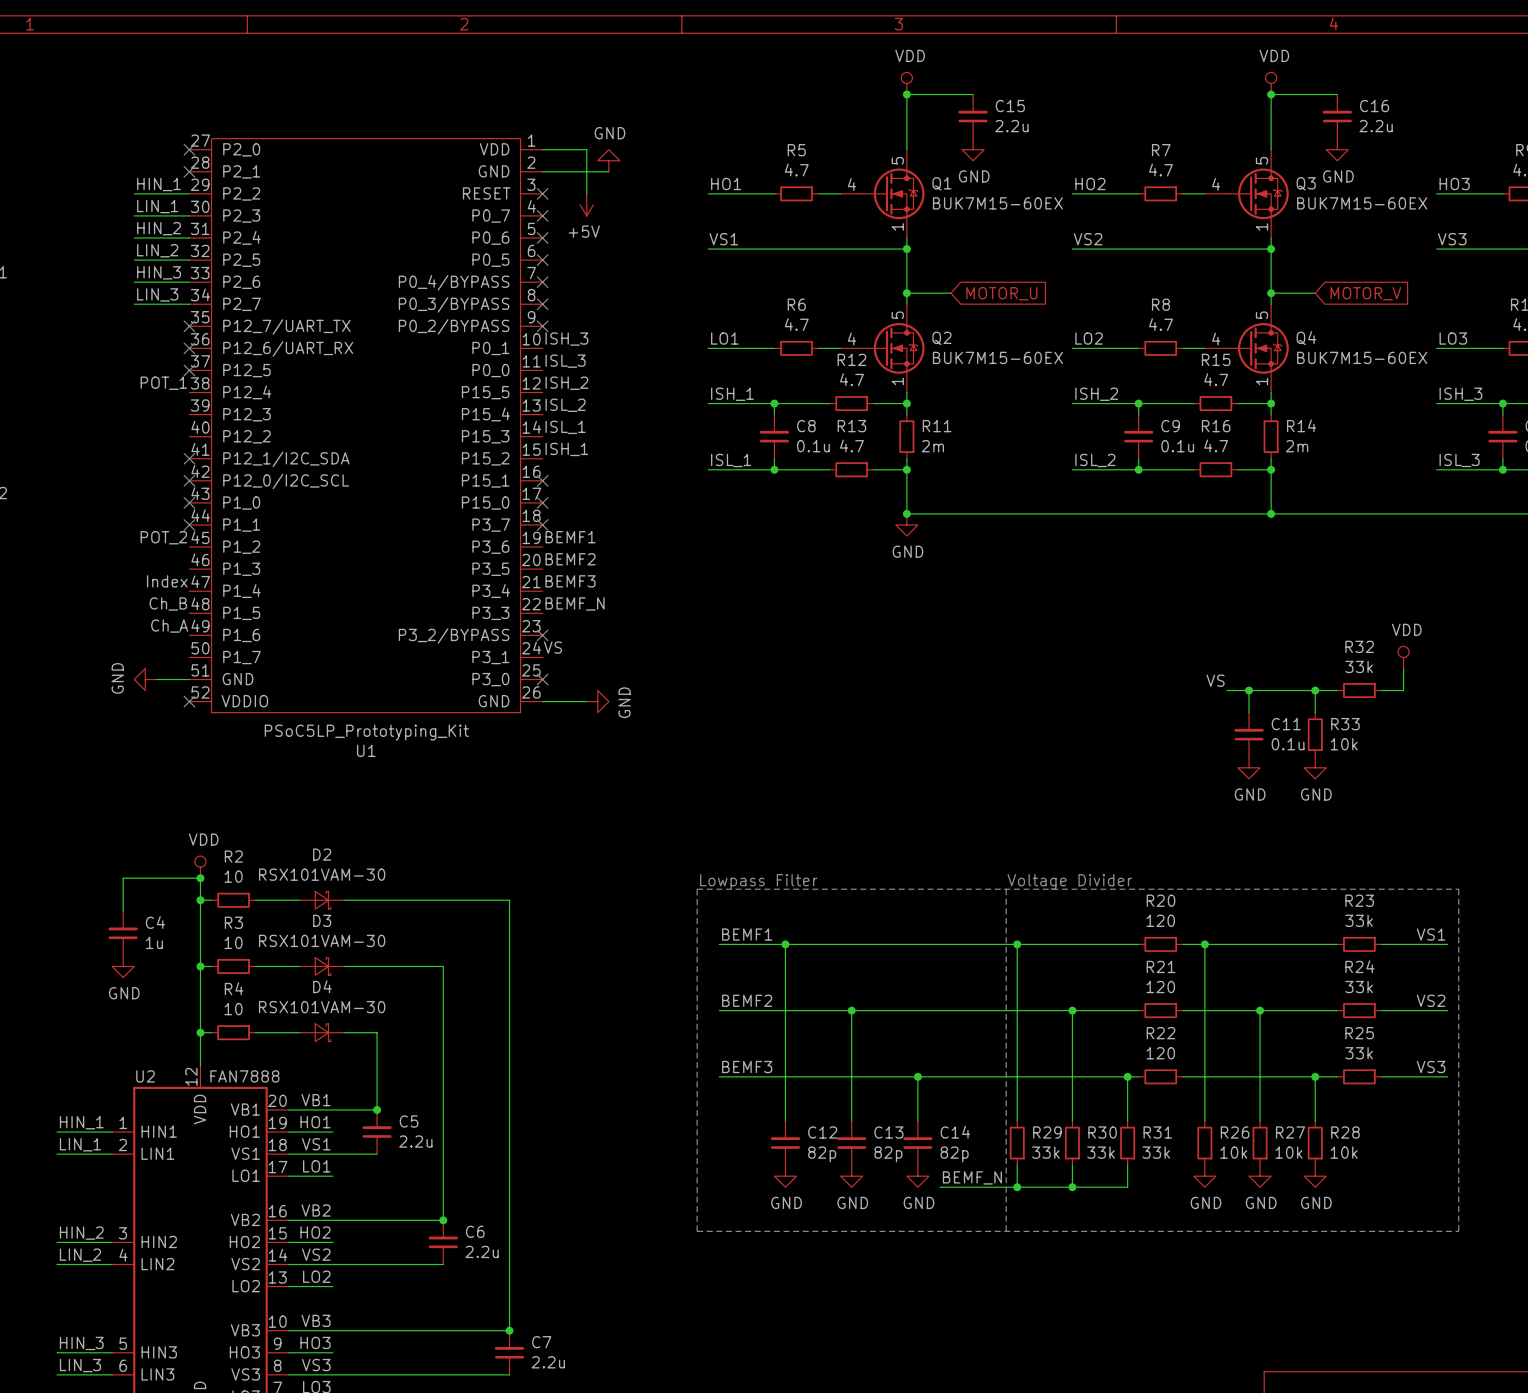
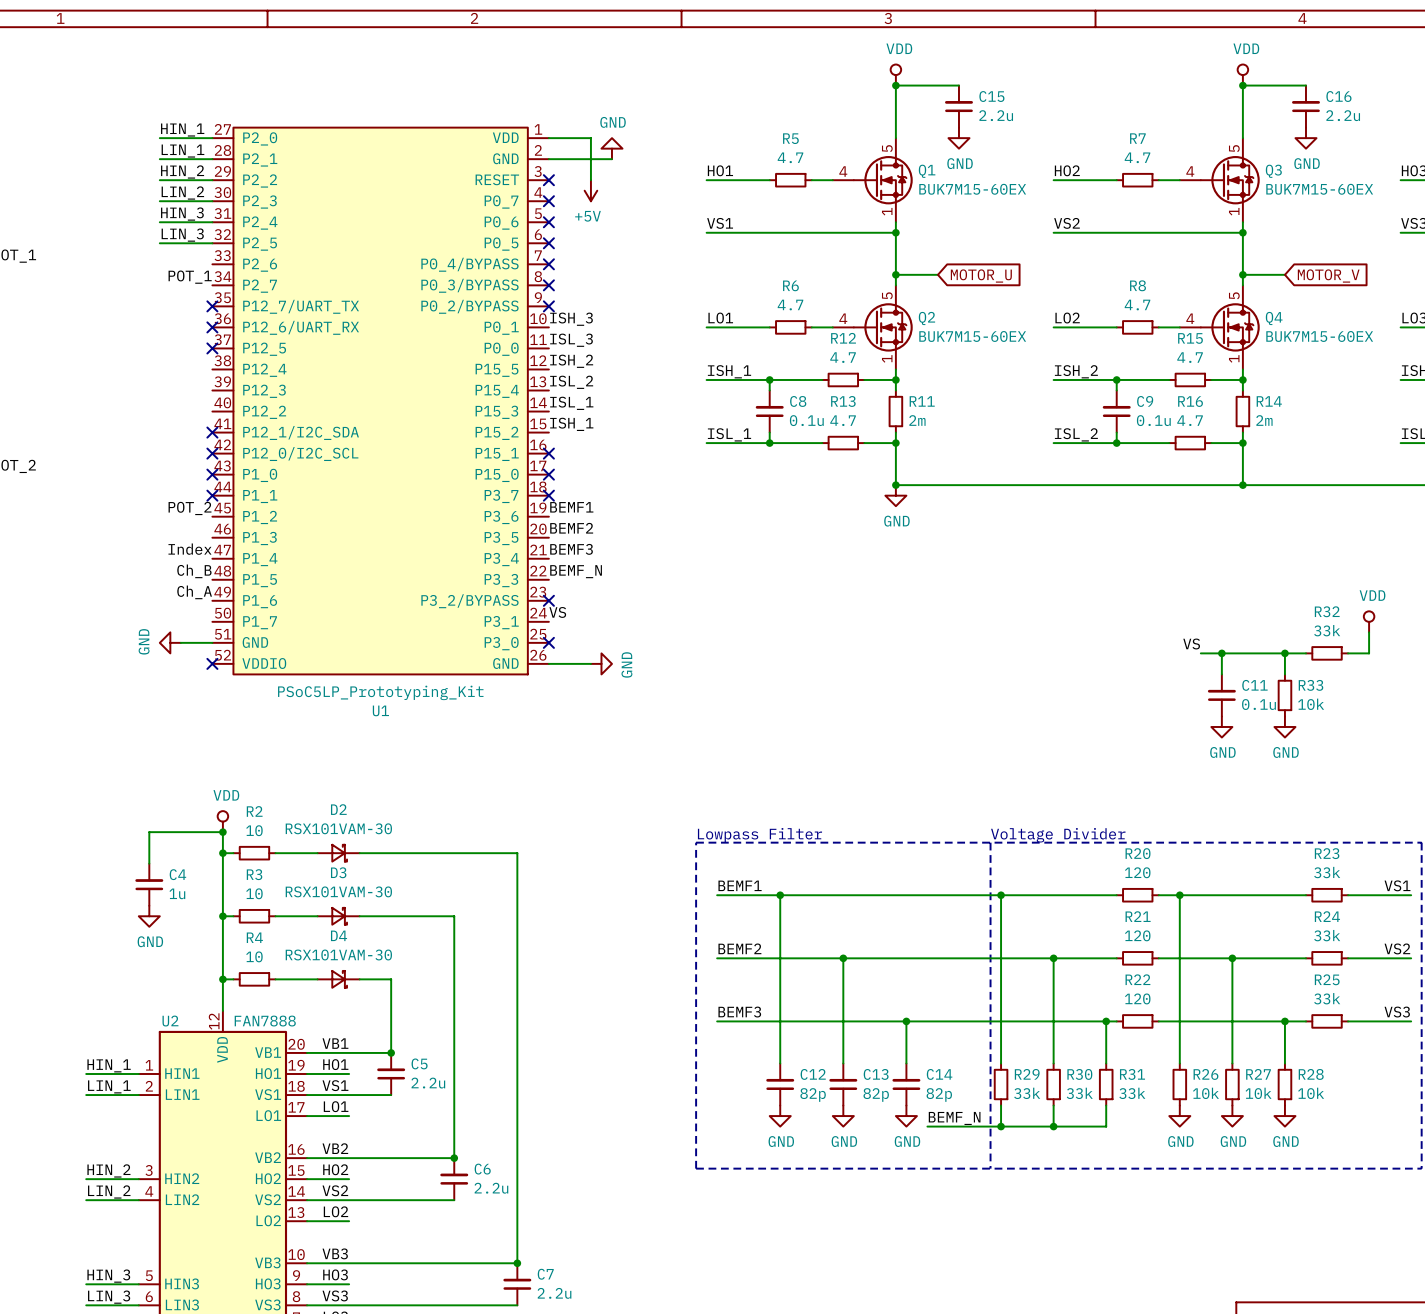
label: none -> HIN_1 (182, 130)
no-connect mark: (189, 149) -> none
label: none -> LIN_1 (182, 151)
no-connect mark: (189, 171) -> none
label: HIN_1 (159, 184) -> HIN_2 (182, 171)
label: LIN_1 (157, 206) -> LIN_2 (182, 193)
label: HIN_2 (159, 228) -> HIN_3 (182, 214)
label: LIN_2 (157, 250) -> LIN_3 (182, 235)
label: HIN_3 (159, 272) -> none
wire: (134, 282) (189, 282) -> (159, 138) (212, 138)
label: LIN_3 (157, 294) -> none
wire: (134, 304) (189, 304) -> (159, 159) (212, 159)
label position: POT_1 (163, 383) -> POT_1 (190, 277)

